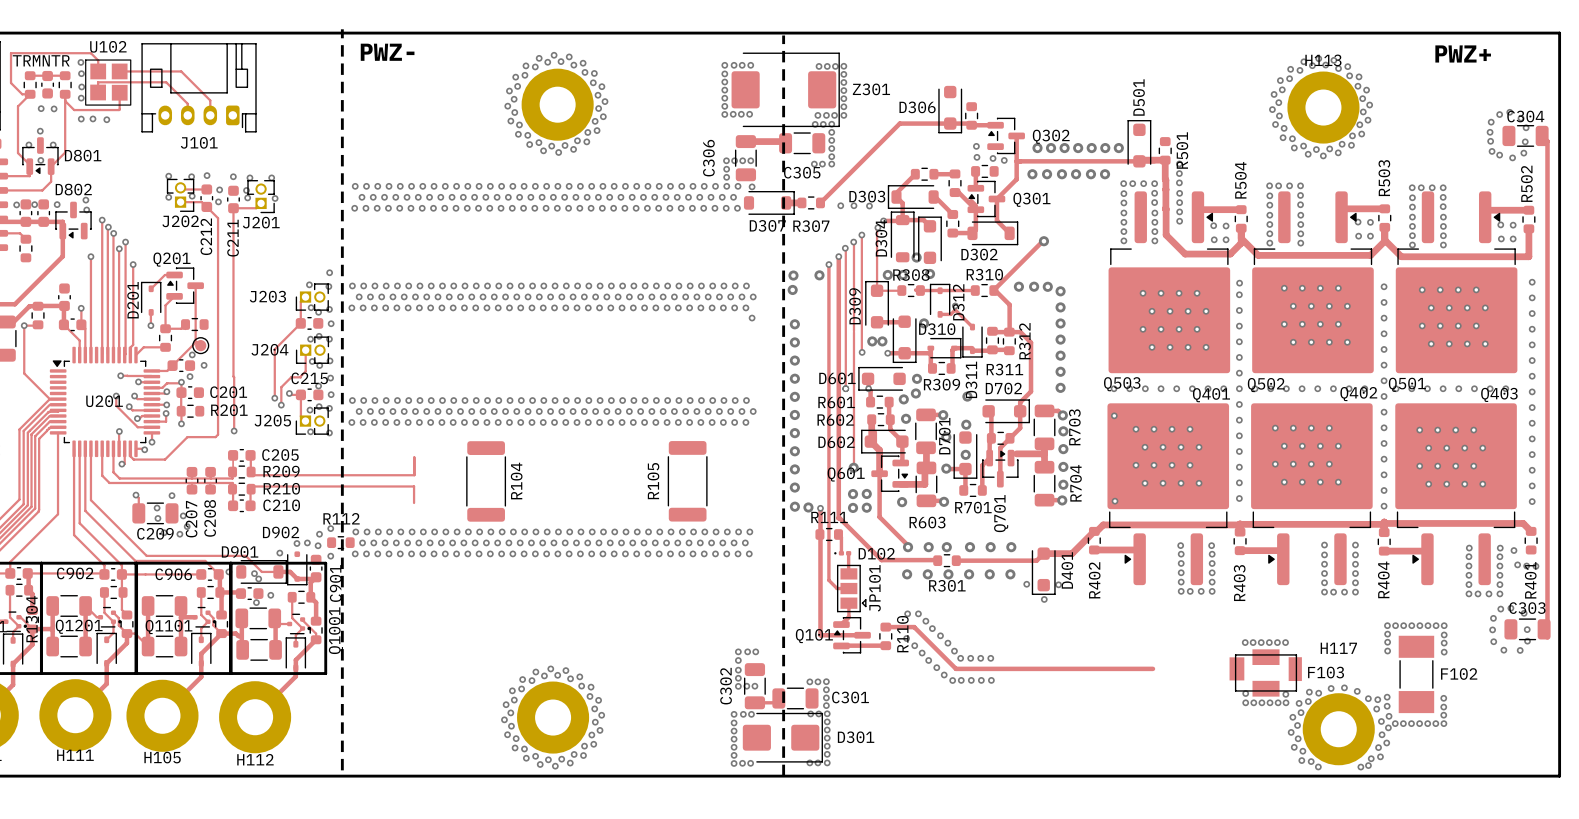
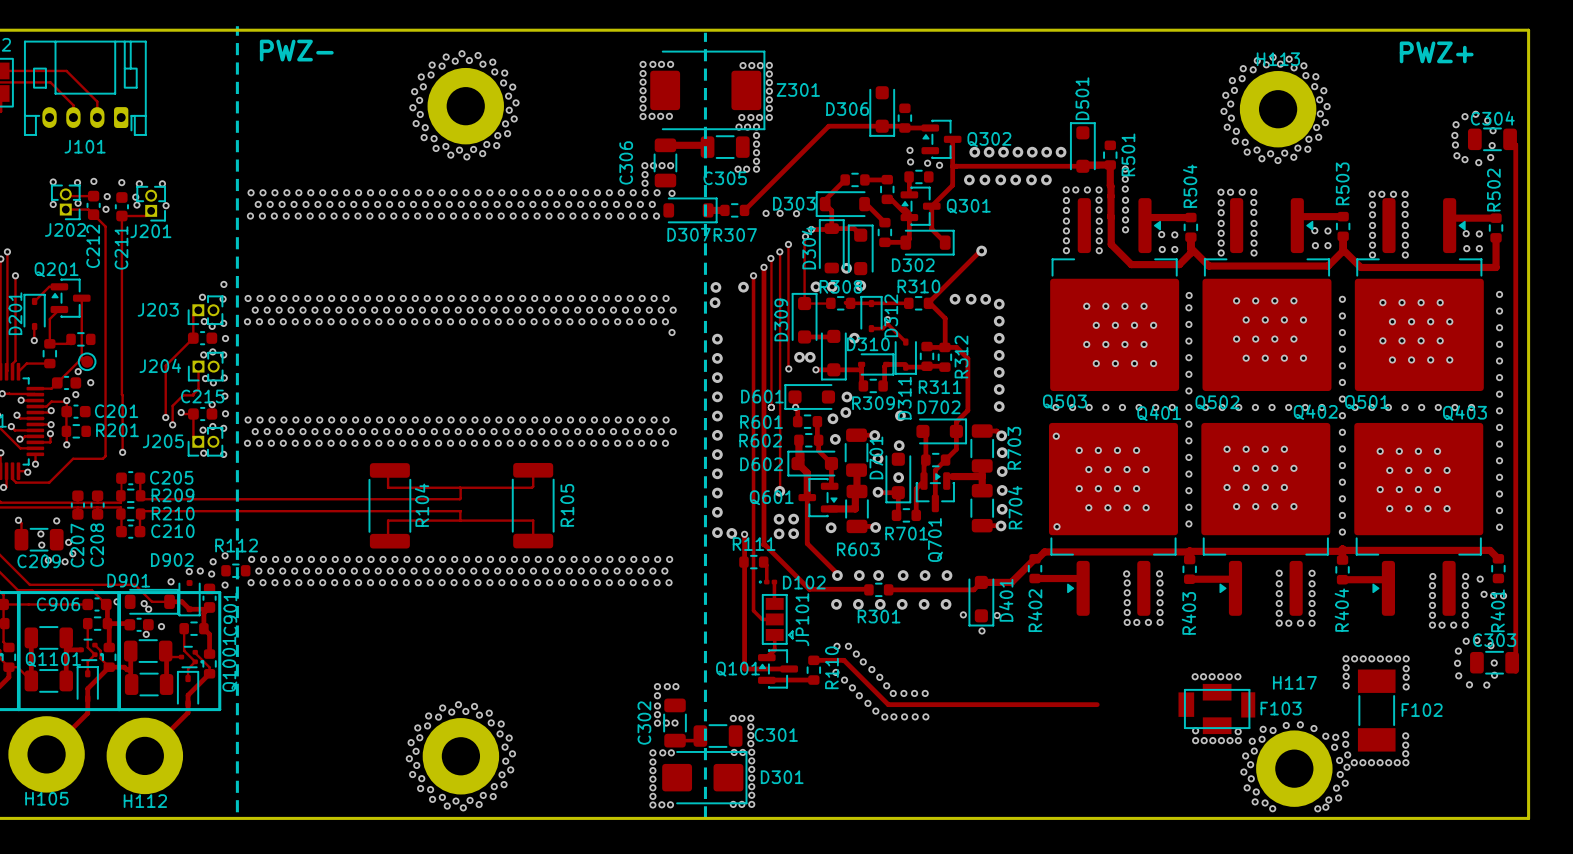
track: none -> (533, 470) (532, 487) (388, 487) (388, 470)
track: (414, 457) (414, 475) -> (460, 487) (459, 499) (313, 499)
R105 position: (687, 481) -> (533, 505)
track: (414, 486) (414, 502) -> (313, 511) (460, 511) (460, 520)
track: none -> (533, 541) (533, 520) (388, 520) (388, 541)

